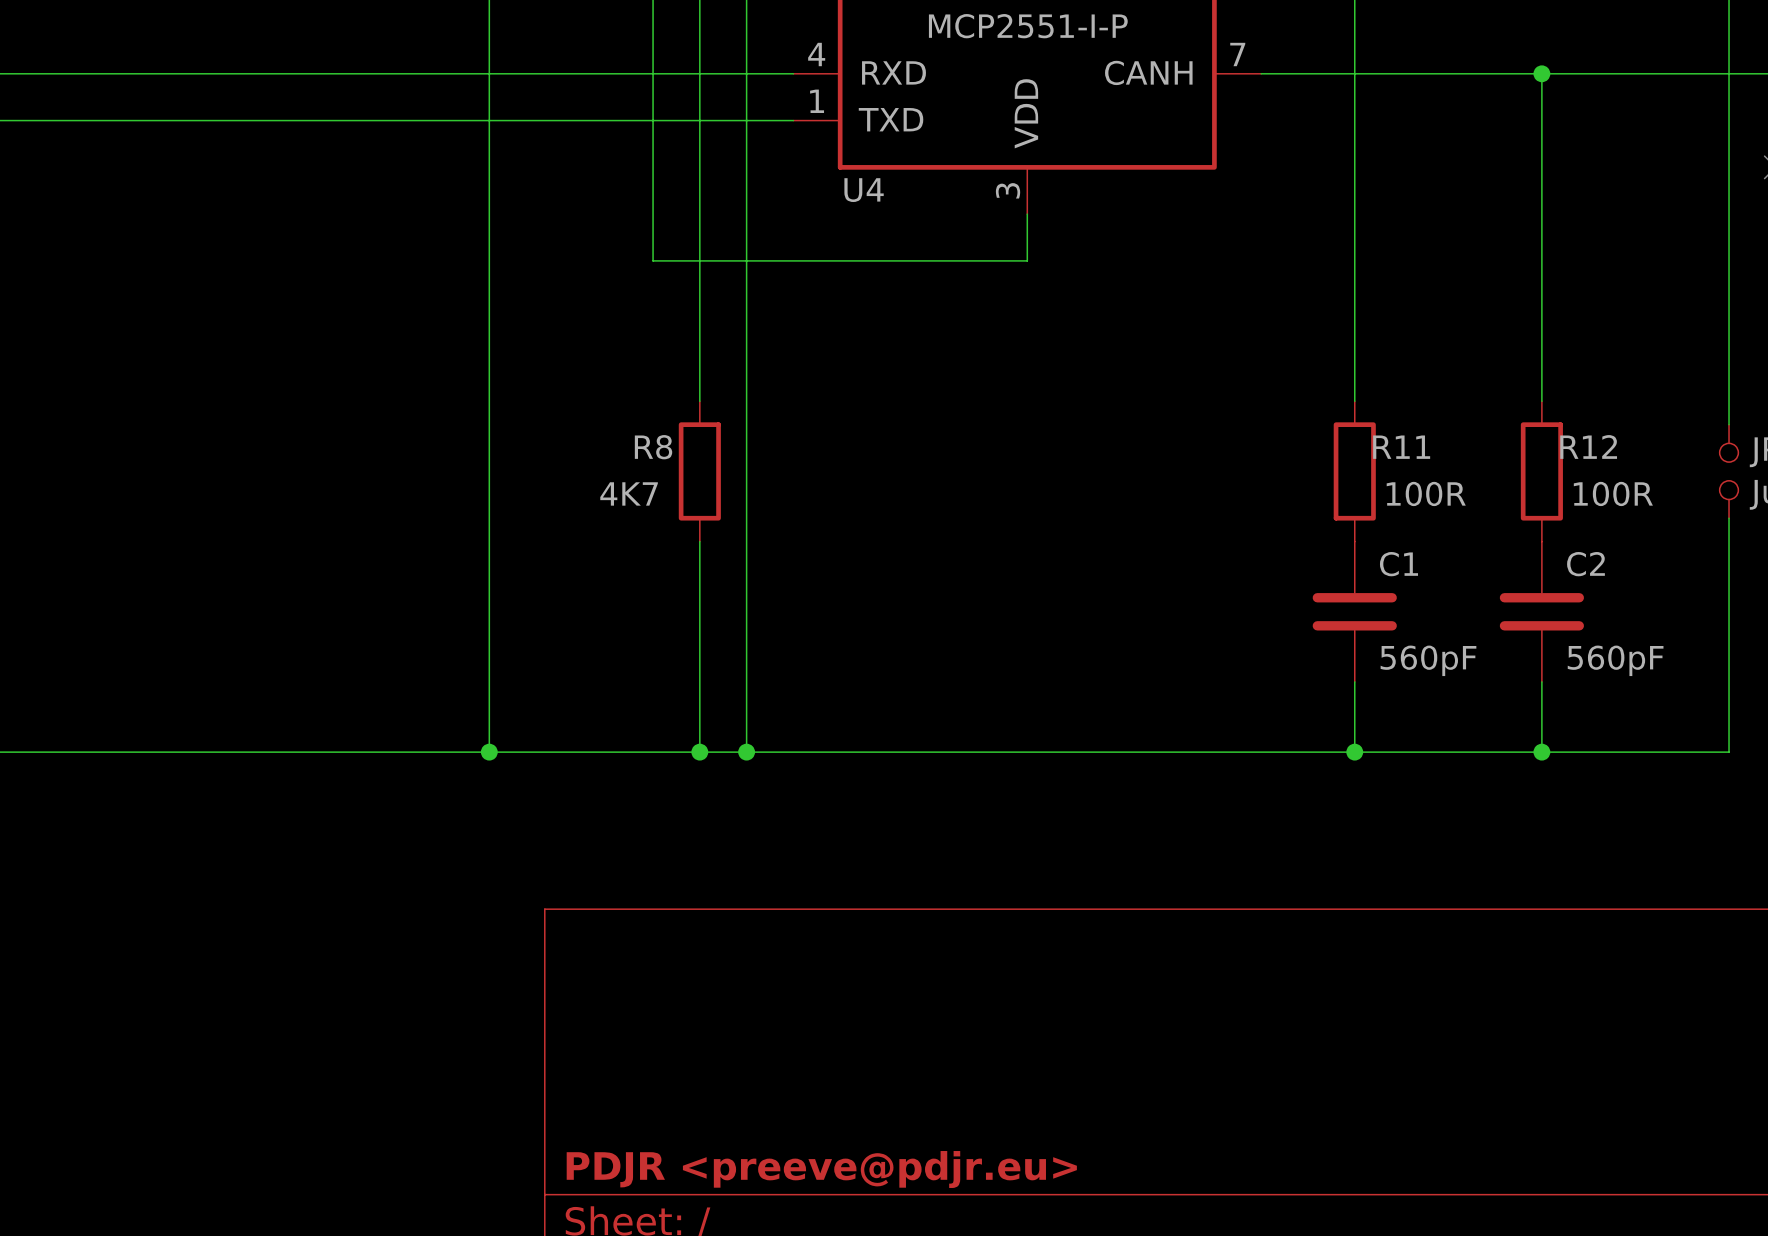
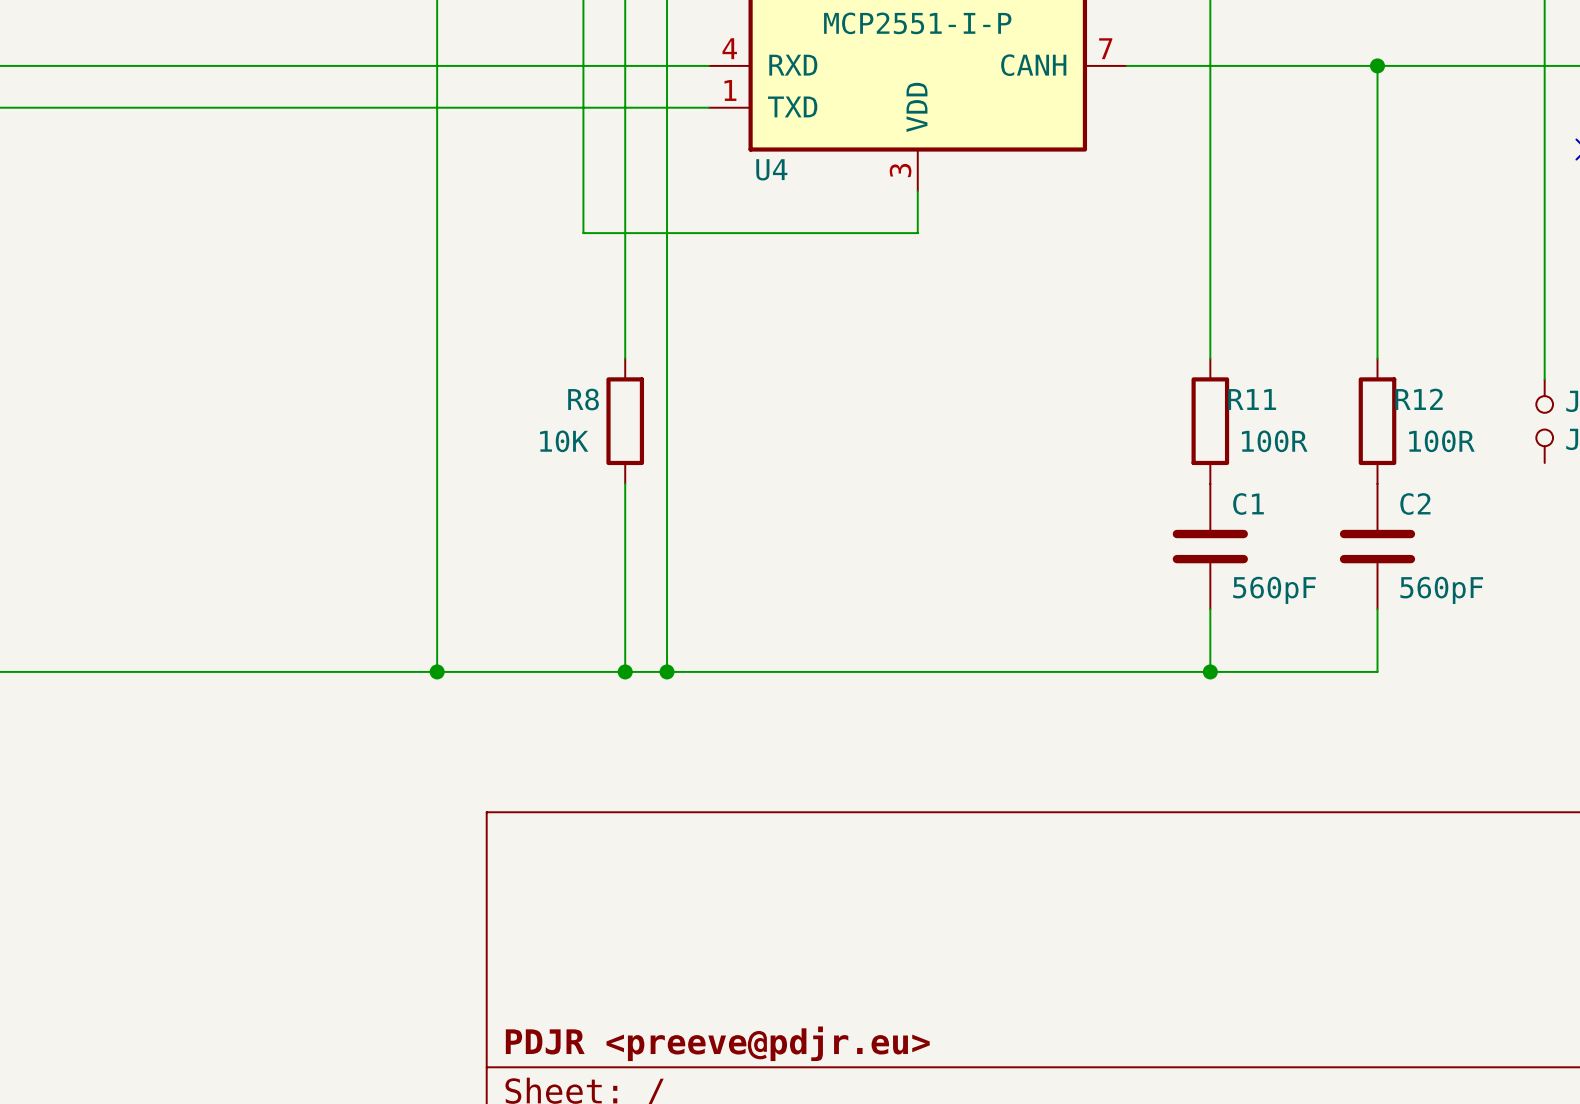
R8 value: 4K7 (629, 493) -> 10K (564, 441)
wire: (1729, 518) (1729, 752) (1541, 752) -> none
junction: (1541, 752) -> none

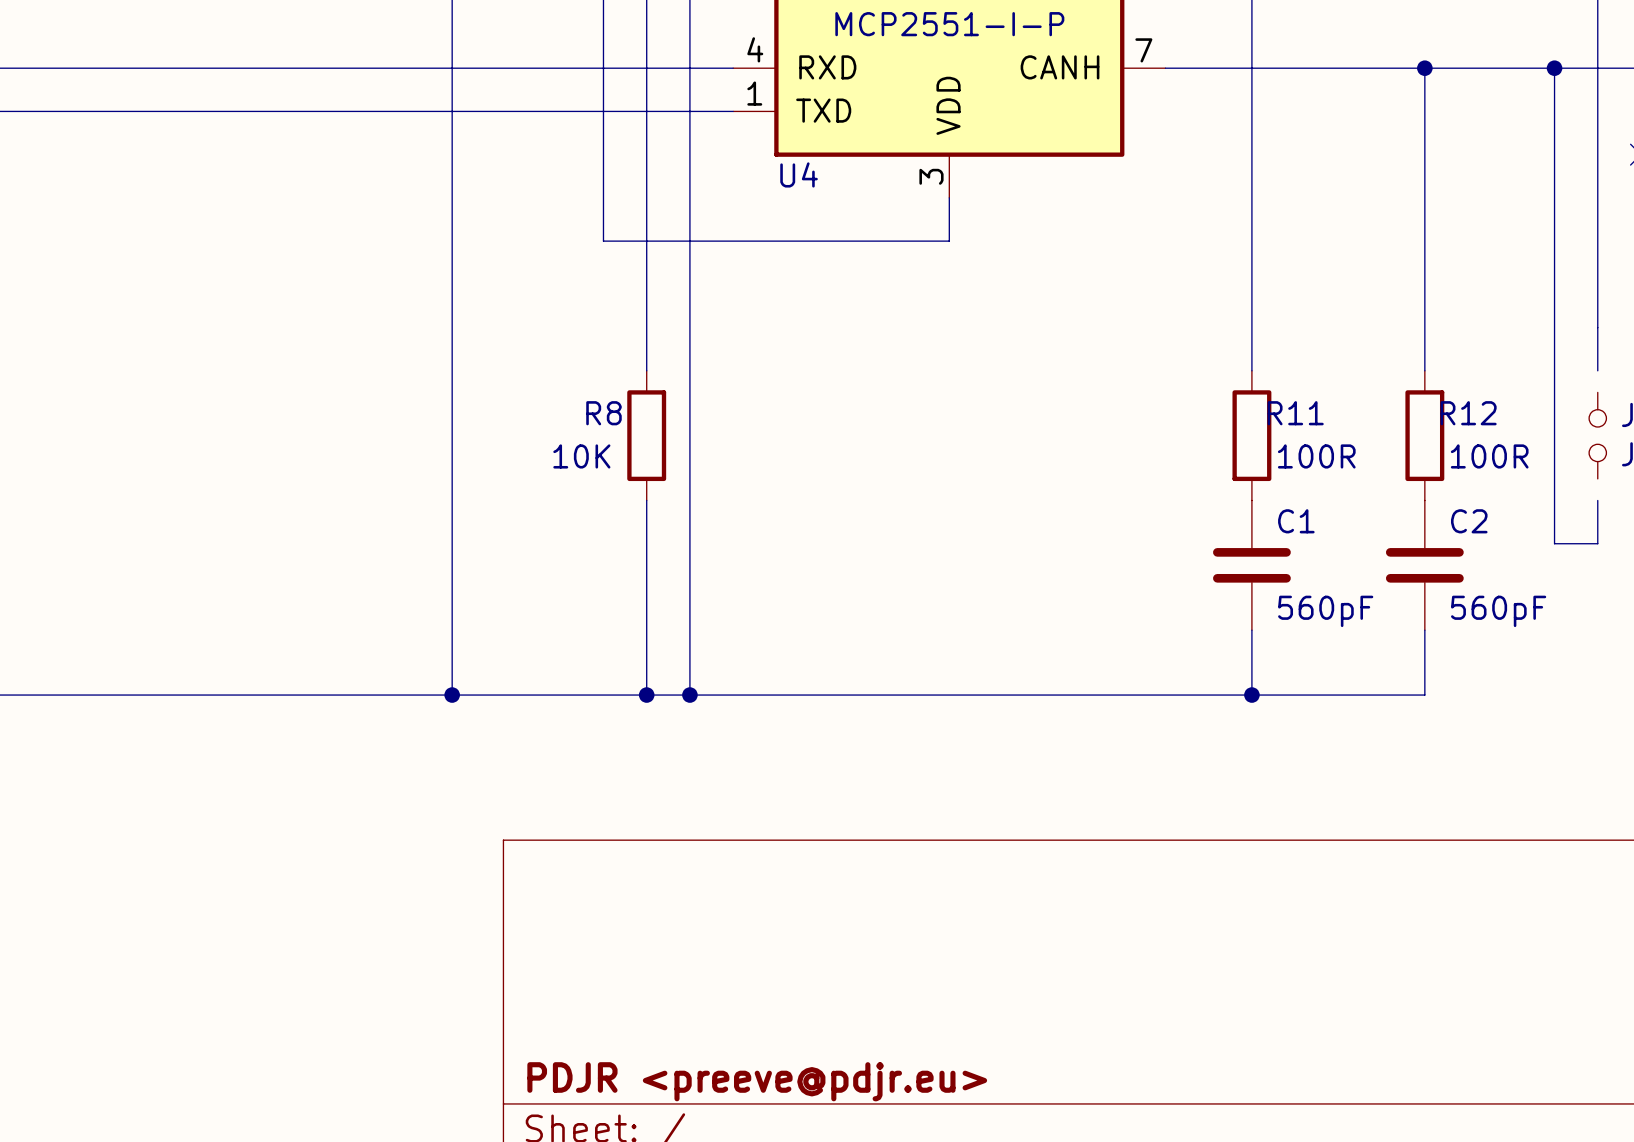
wire: none -> (1554, 68) (1554, 543) (1597, 543) (1597, 500)
junction: none -> (1554, 68)
wire: (1544, 358) (1544, 379) -> none

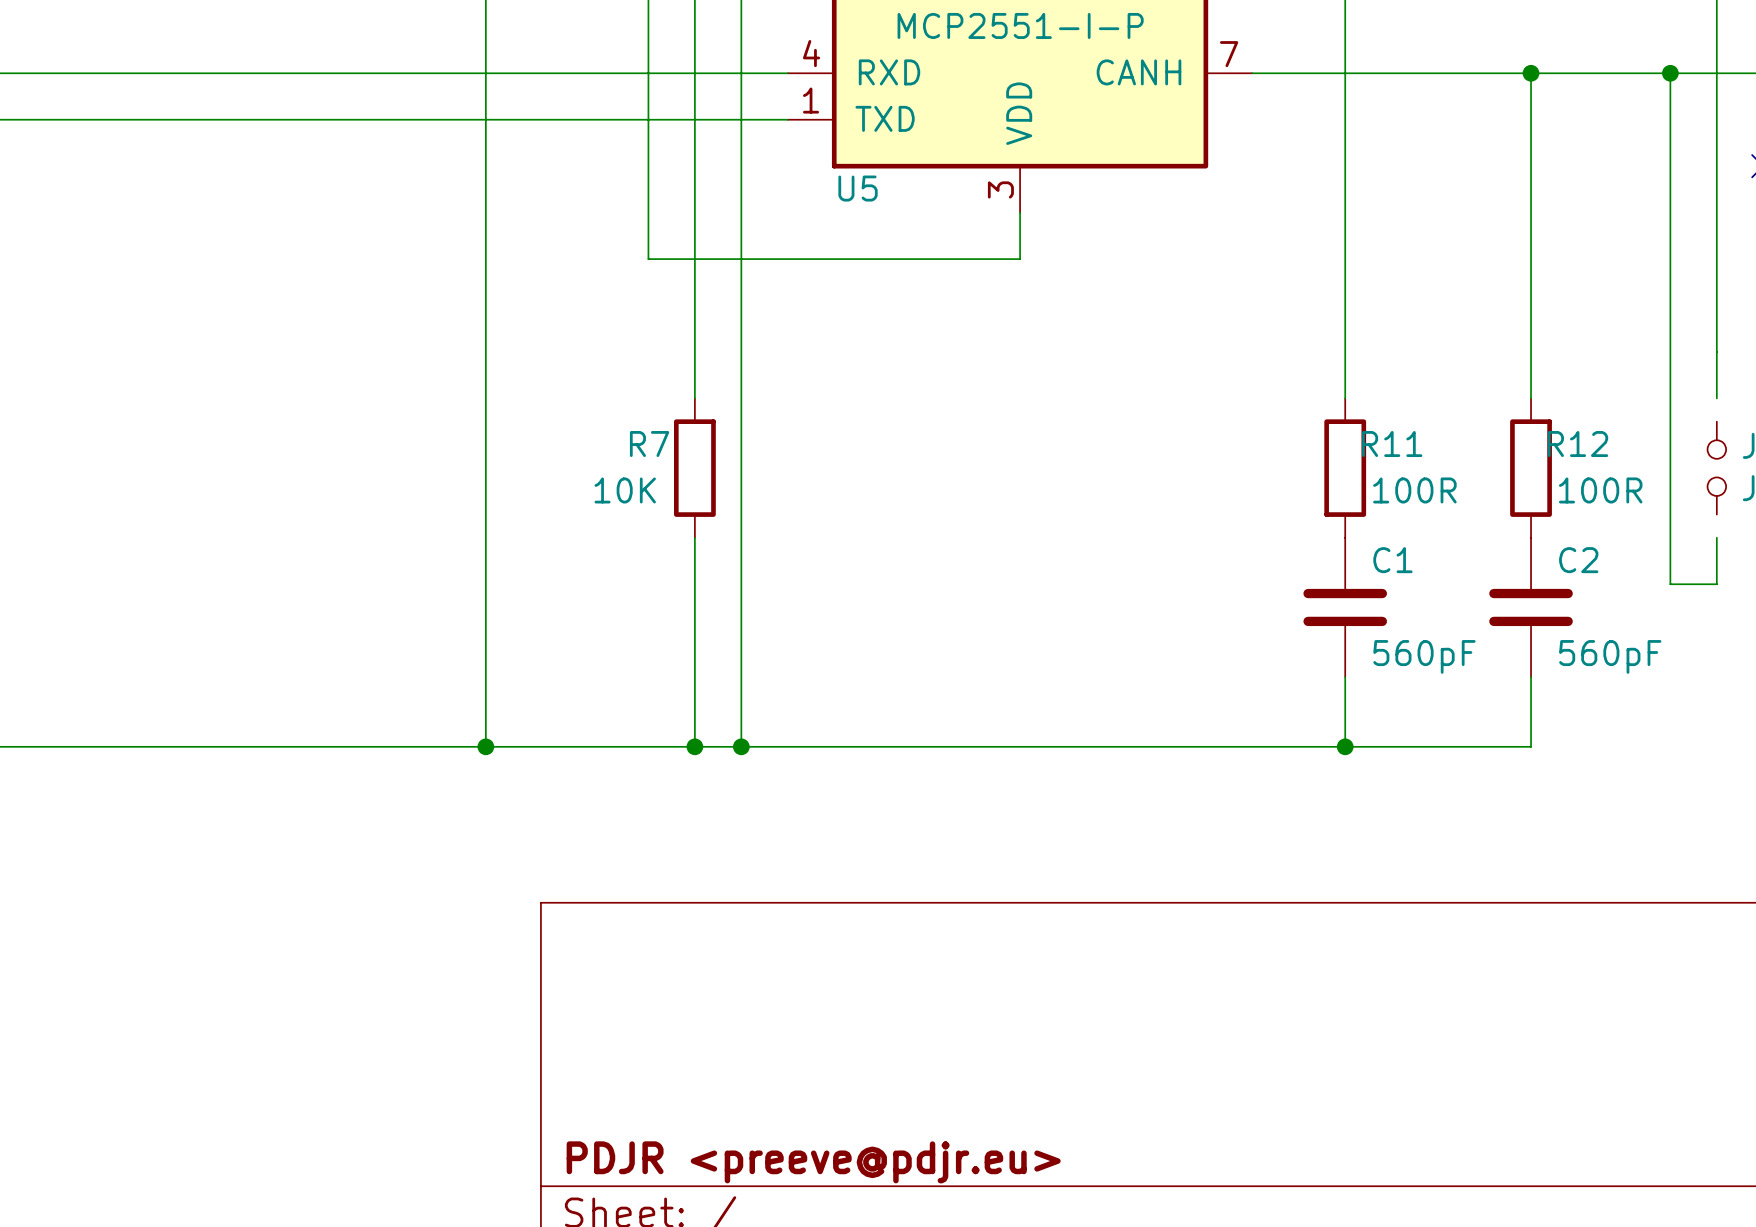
U4 name: U4 (799, 174) -> U5 (858, 188)
R8 name: R8 (603, 413) -> R7 (649, 444)

